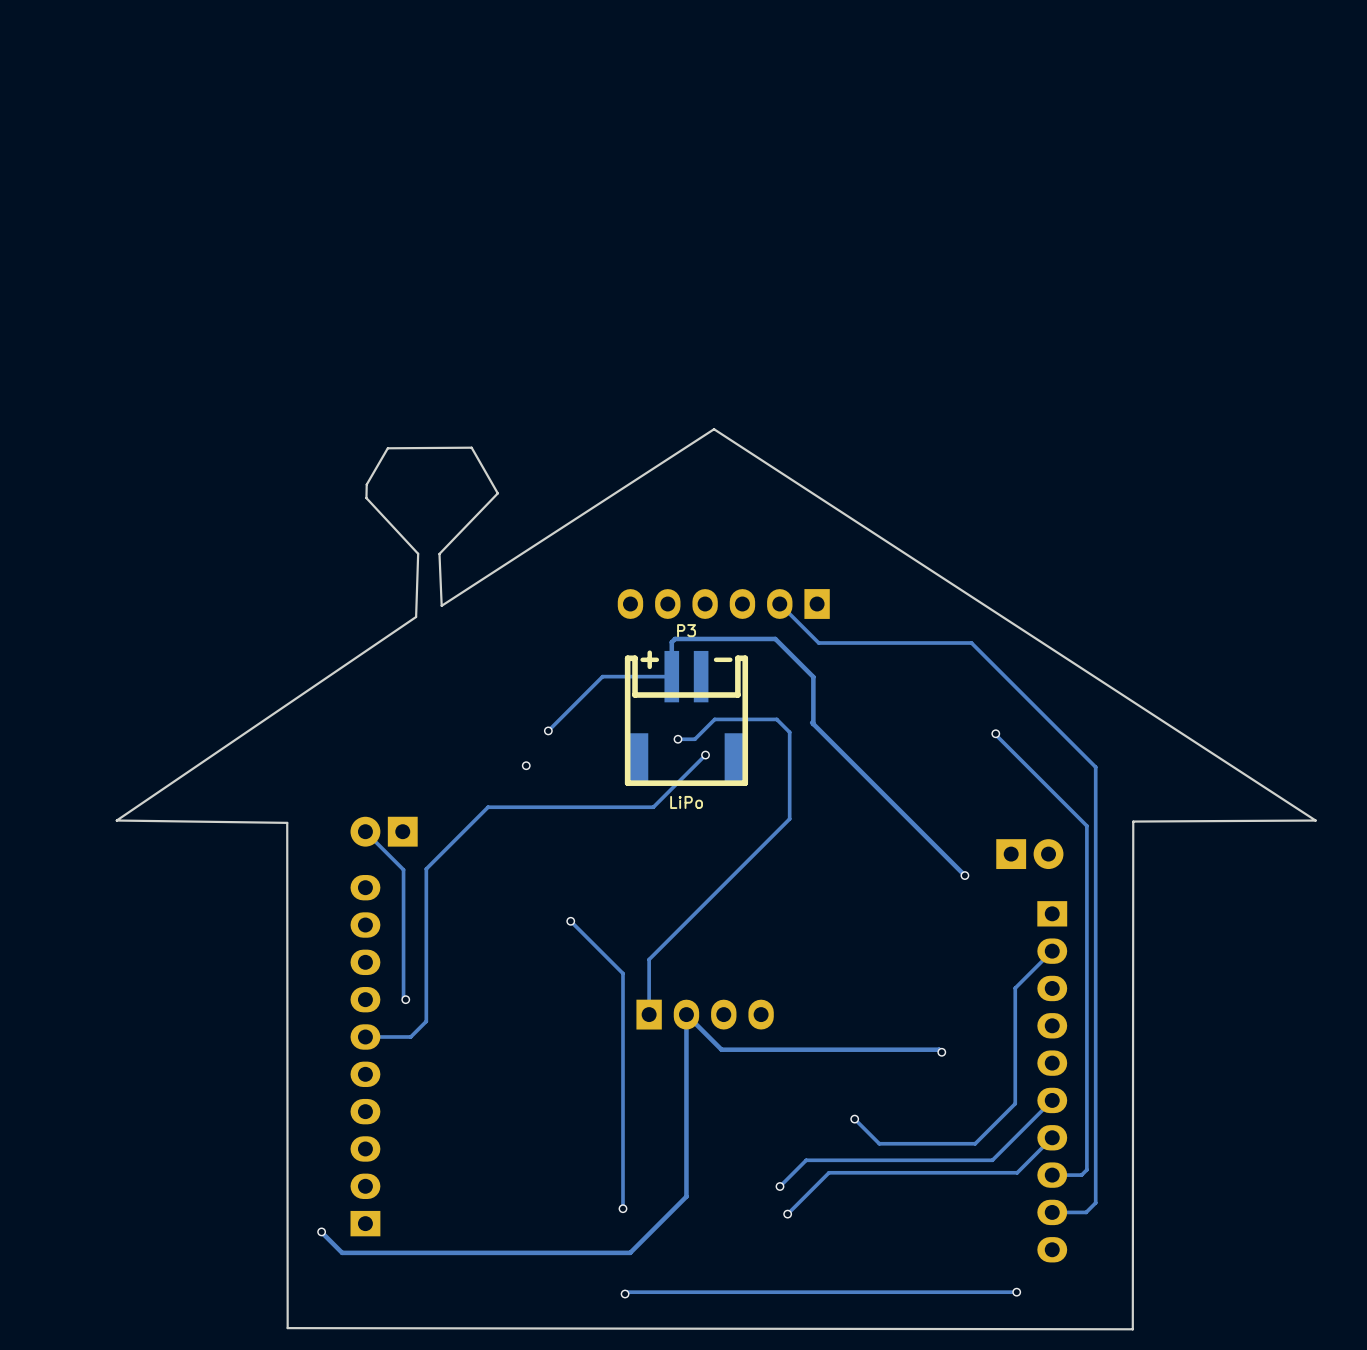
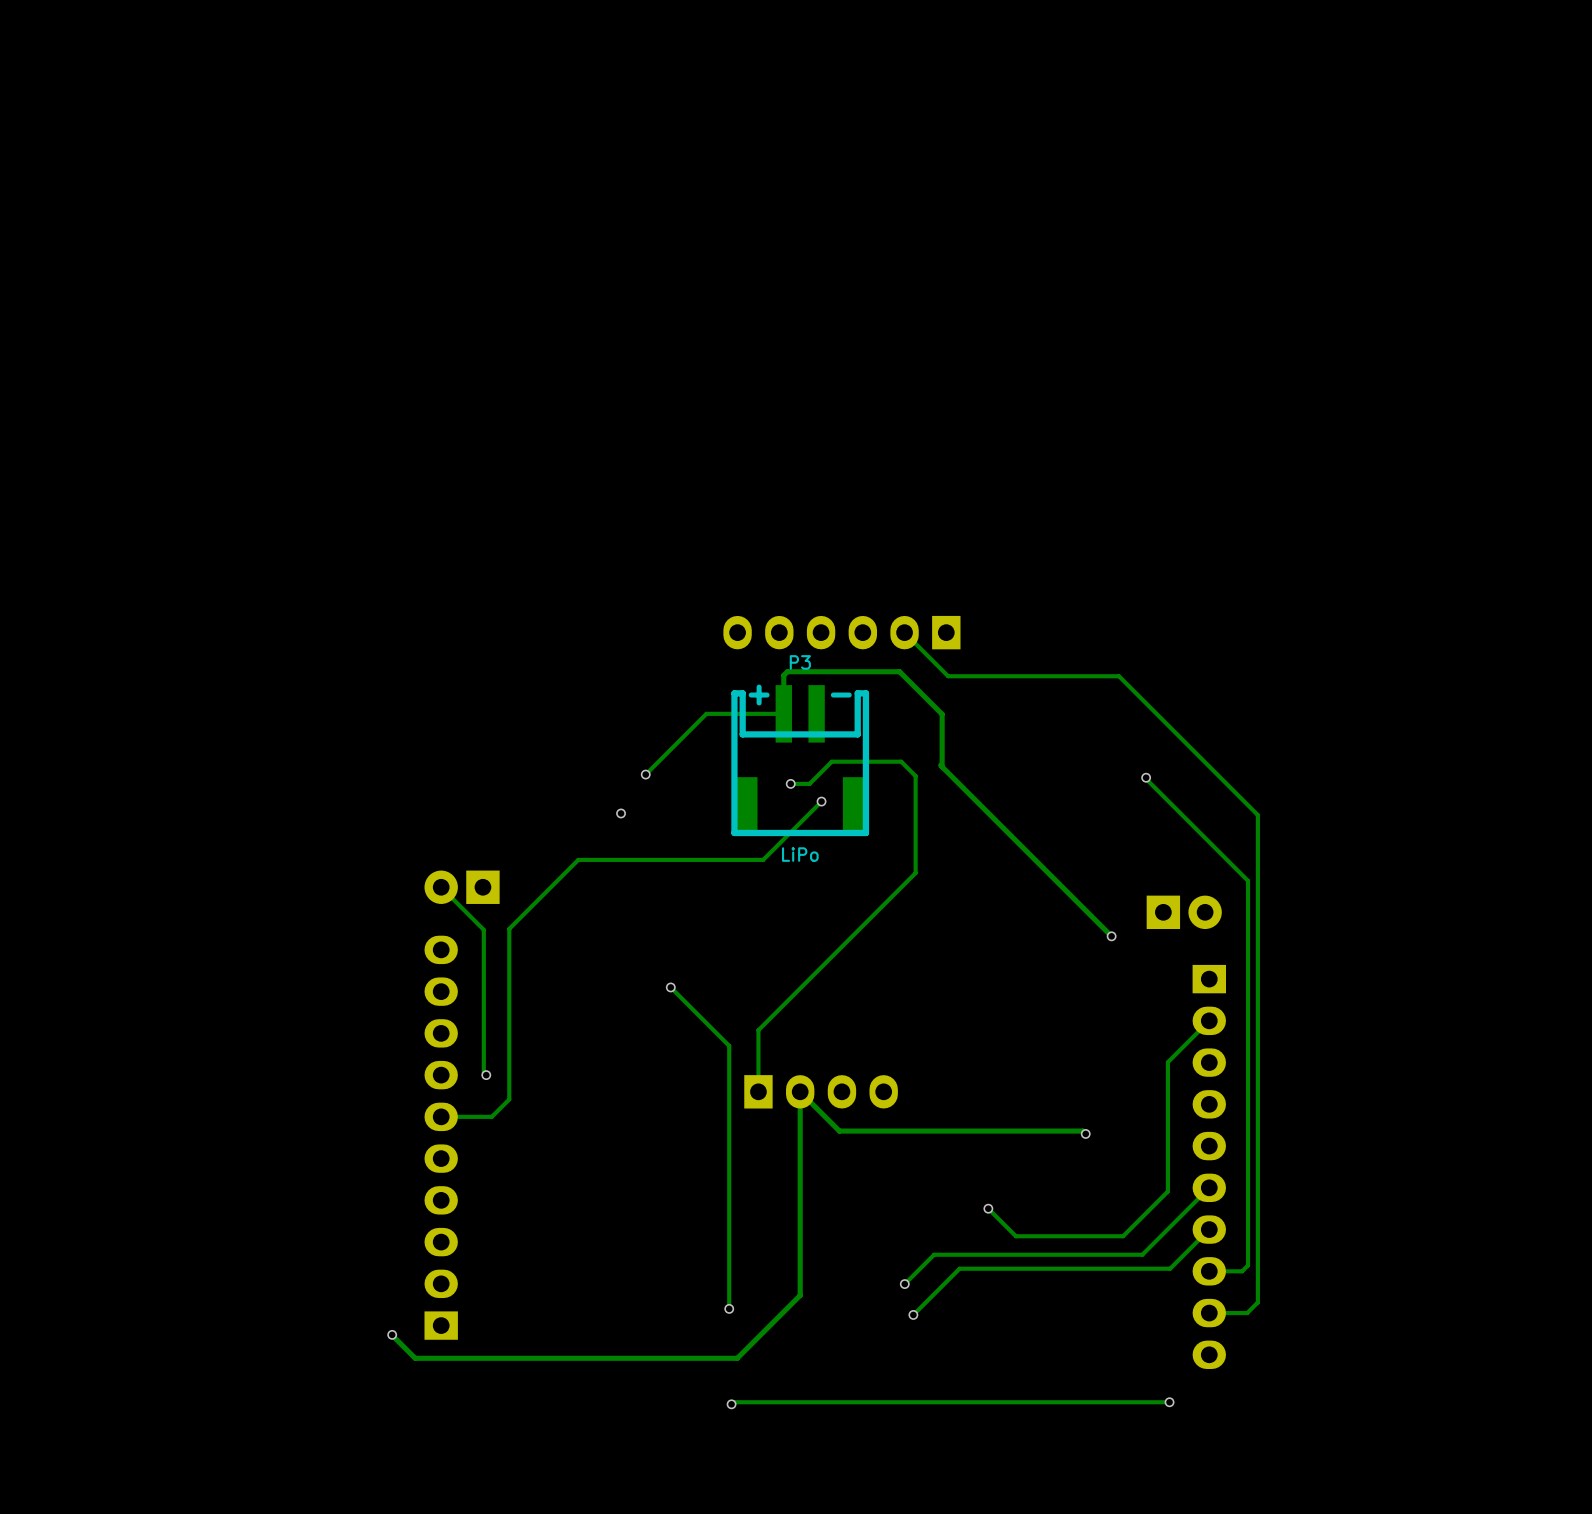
board edge: (713, 429) (1315, 820) -> none
board edge: (714, 429) (441, 605) -> none
board edge: (387, 448) (366, 484) (366, 498) (418, 553) (416, 616) (116, 820) (287, 822) (287, 1328) (1132, 1329) -> none
board edge: (387, 448) (471, 447) (497, 493) (439, 553) (441, 605) -> none
board edge: (1315, 820) (1133, 821) -> none
board edge: (1133, 821) (1132, 1329) -> none

